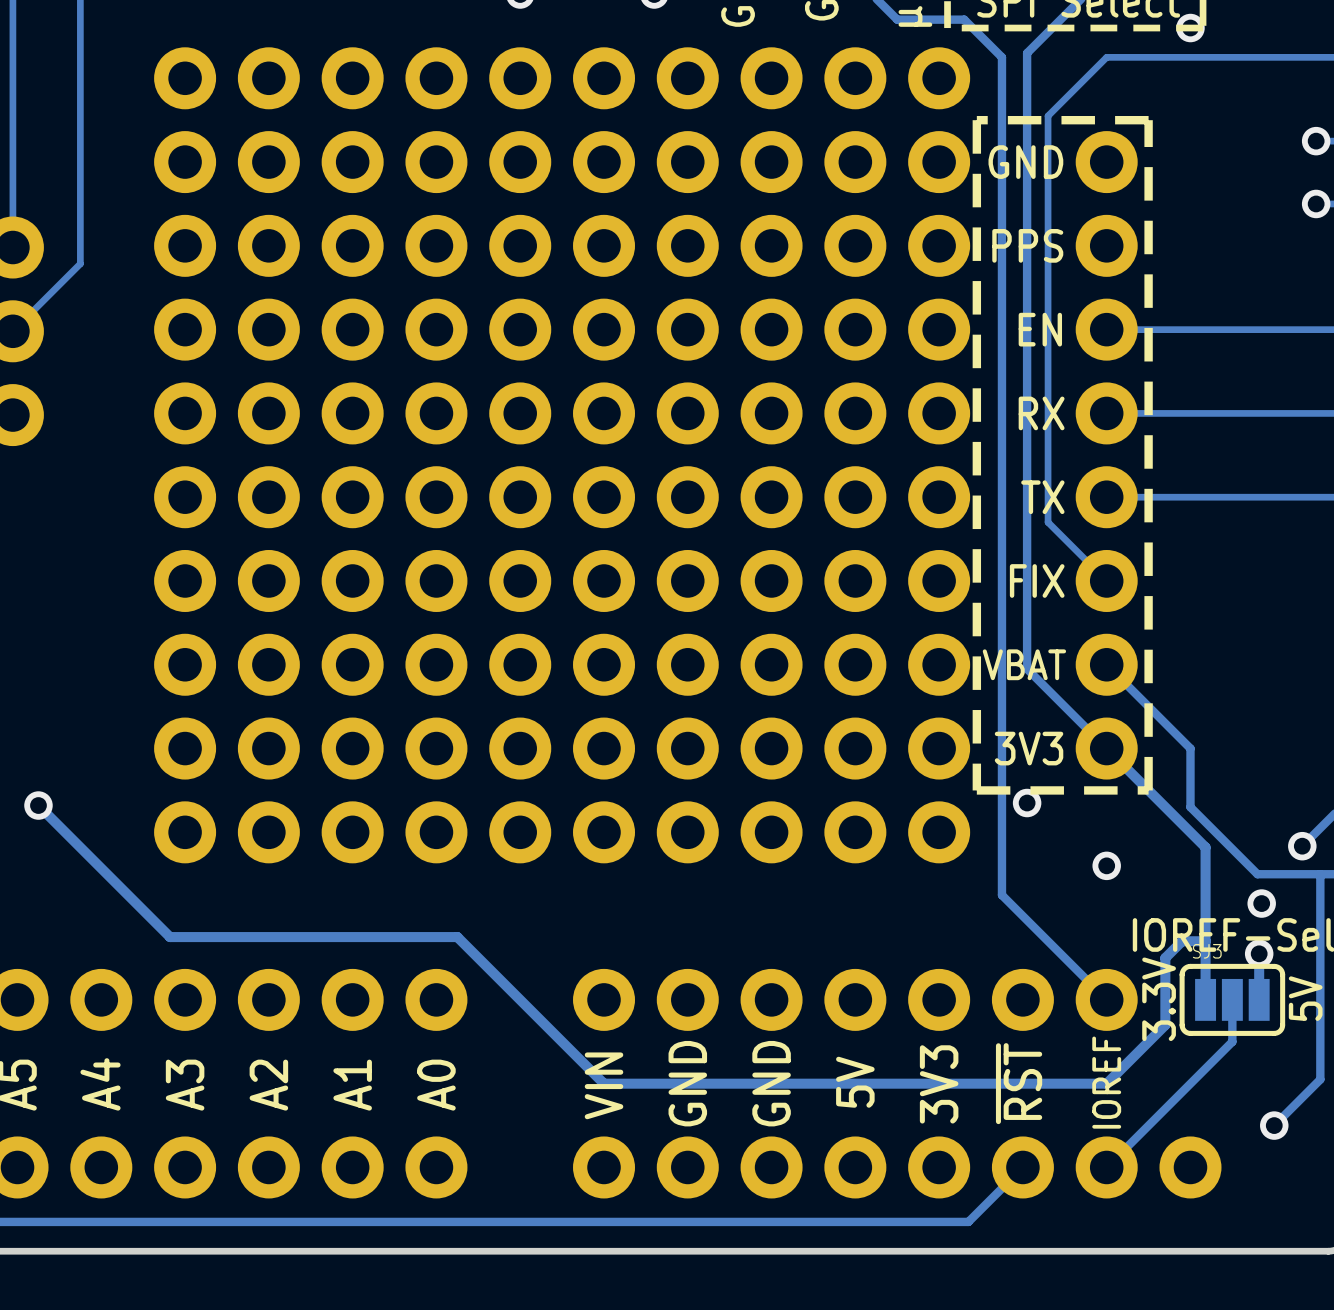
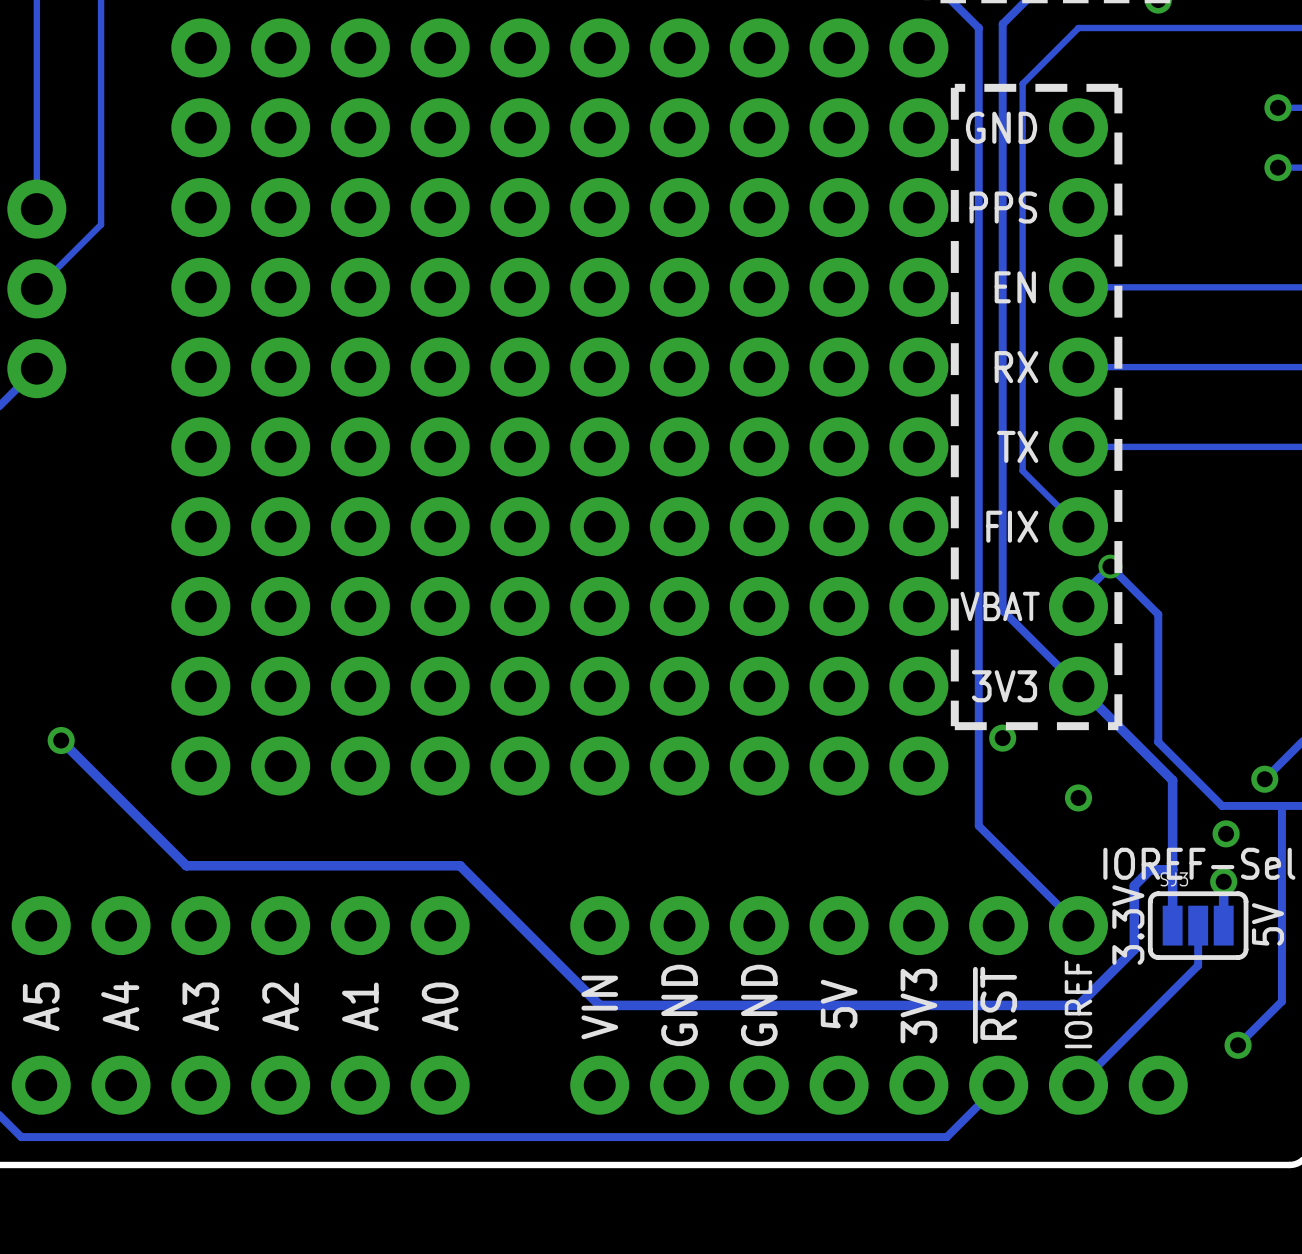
via: none -> (1110, 566)
track: (1106, 664) (1190, 748) -> (1078, 606) (1078, 598) (1110, 566) (1158, 614) (1158, 686)

